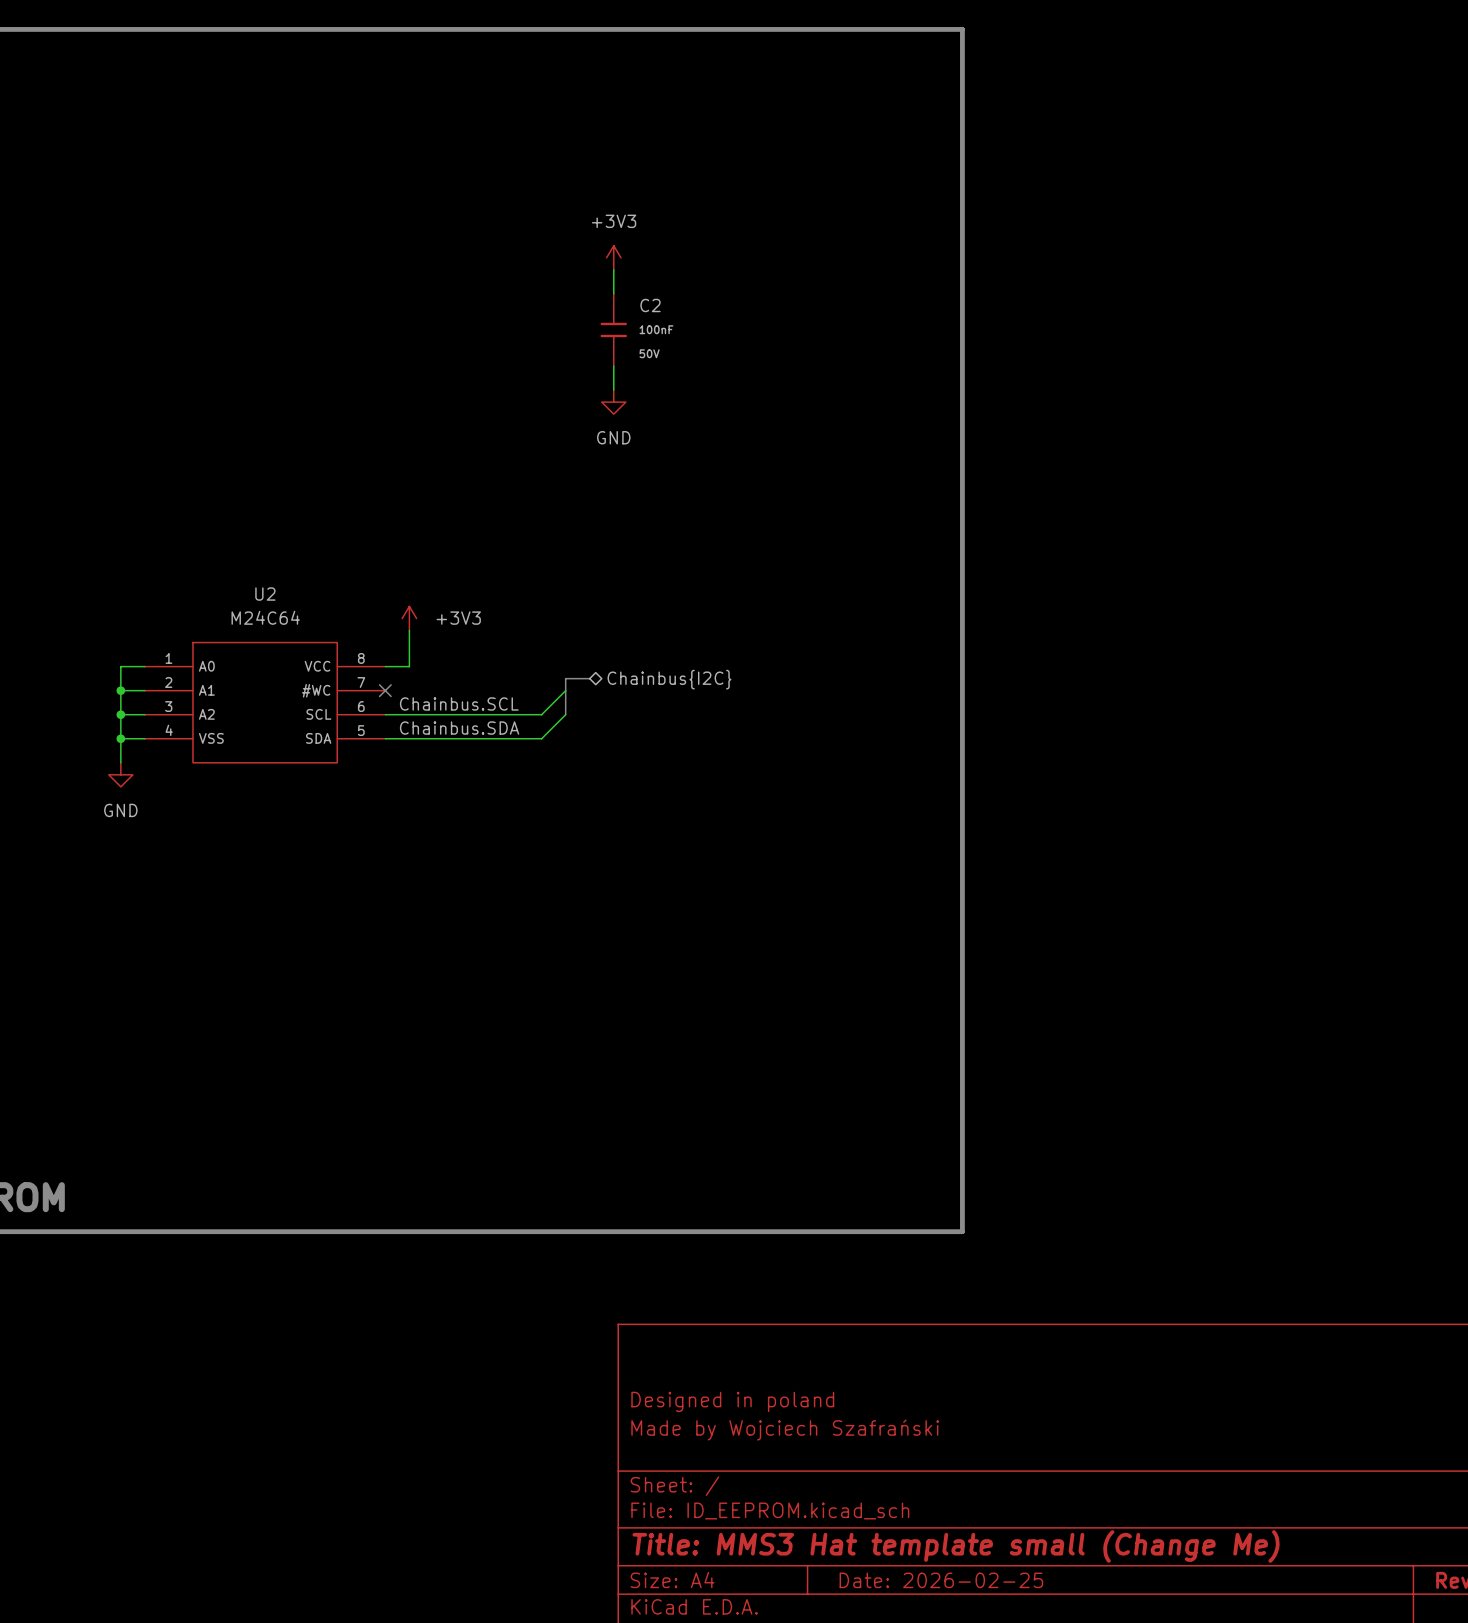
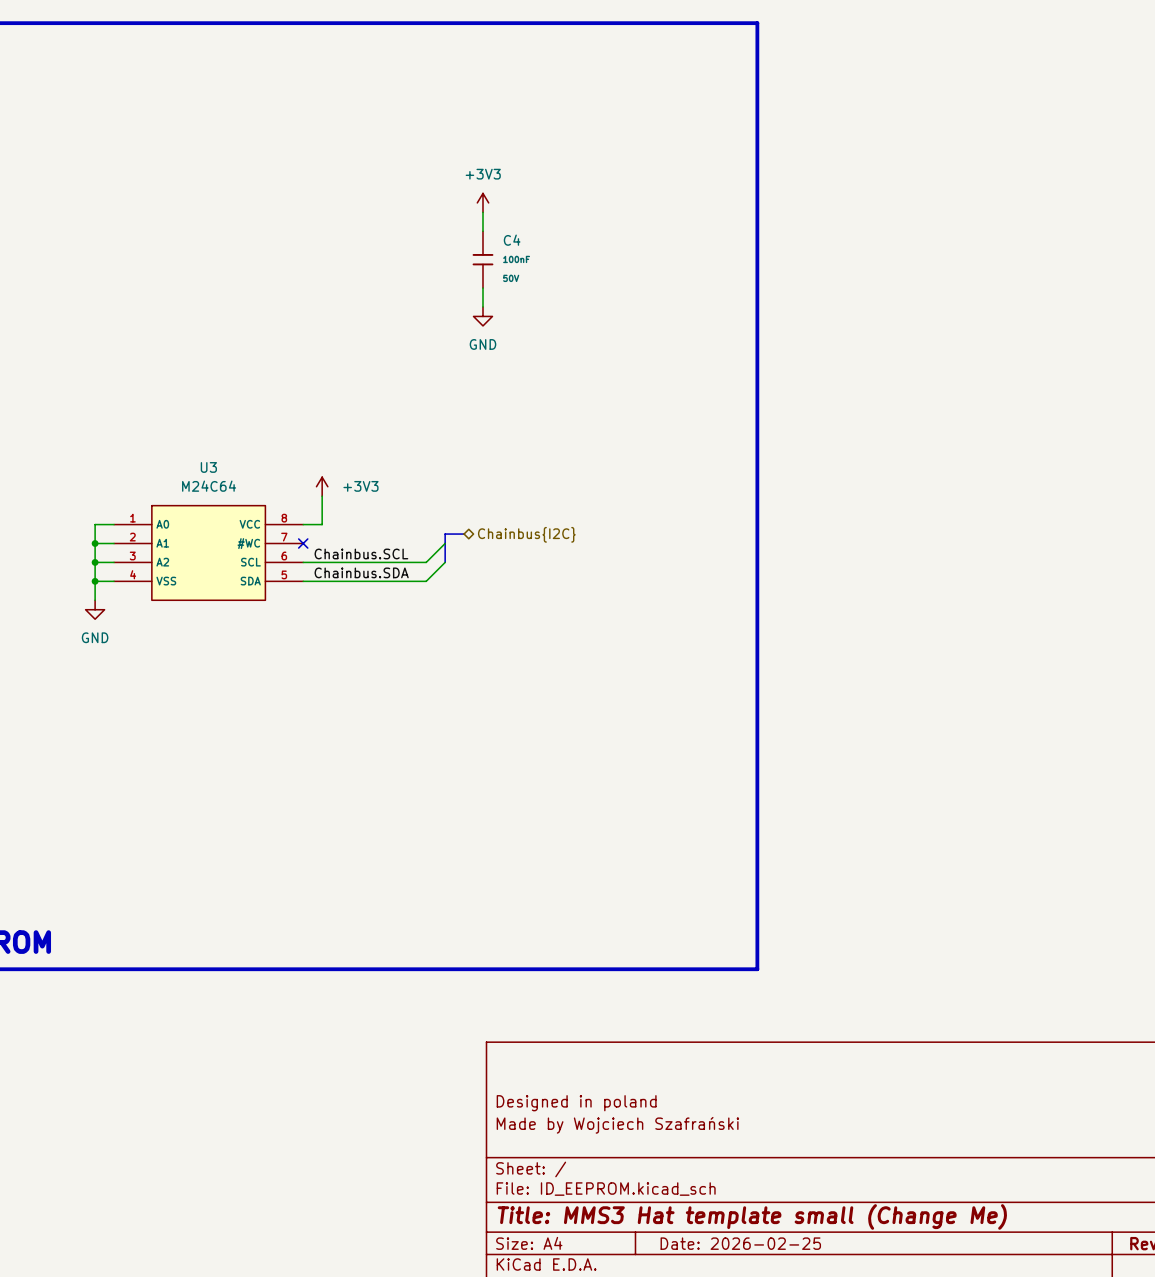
C2 name: C2 (650, 305) -> C4 (512, 240)
U2 name: U2 (265, 594) -> U3 (208, 467)

